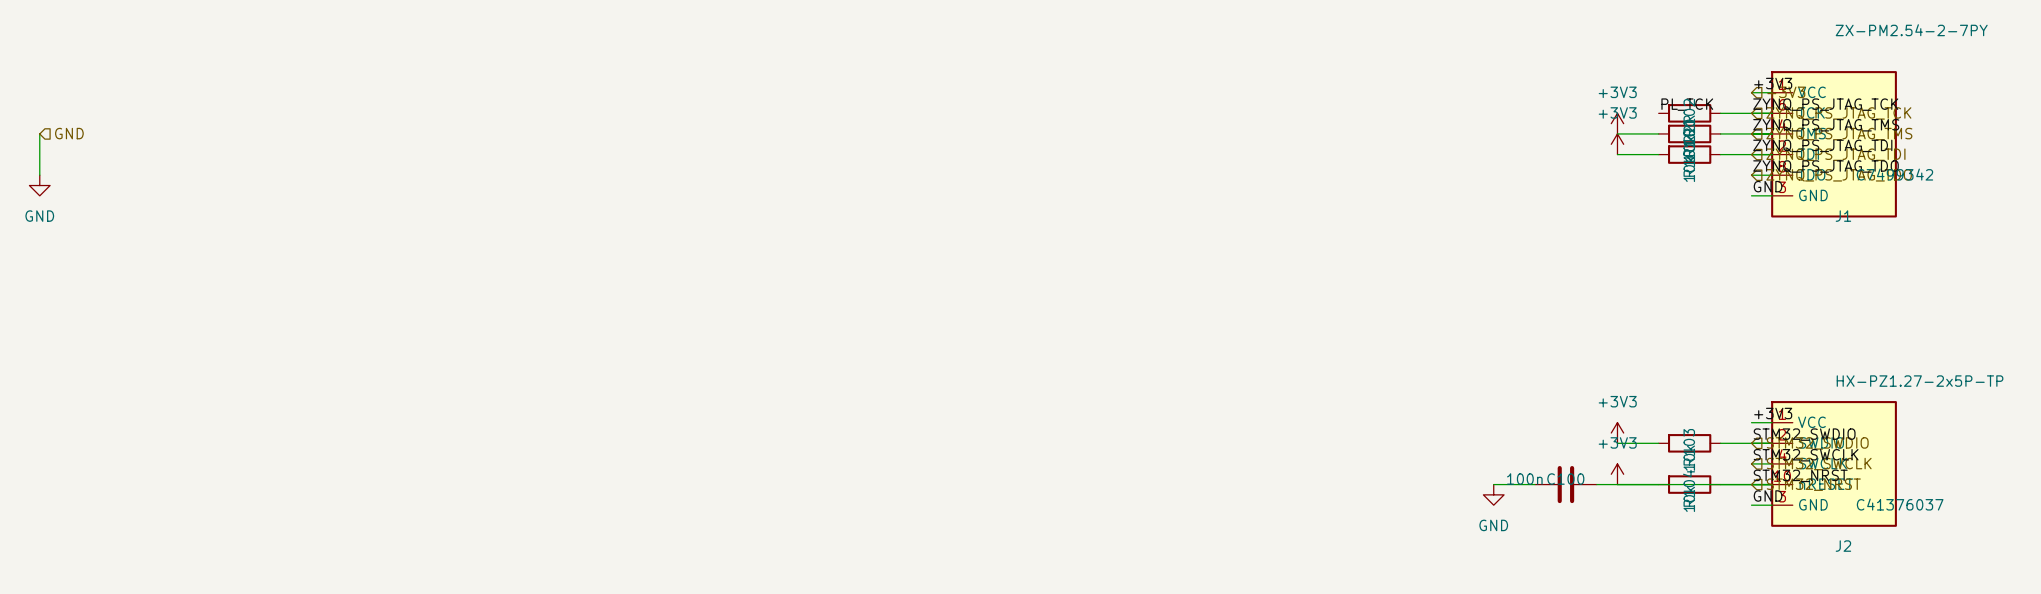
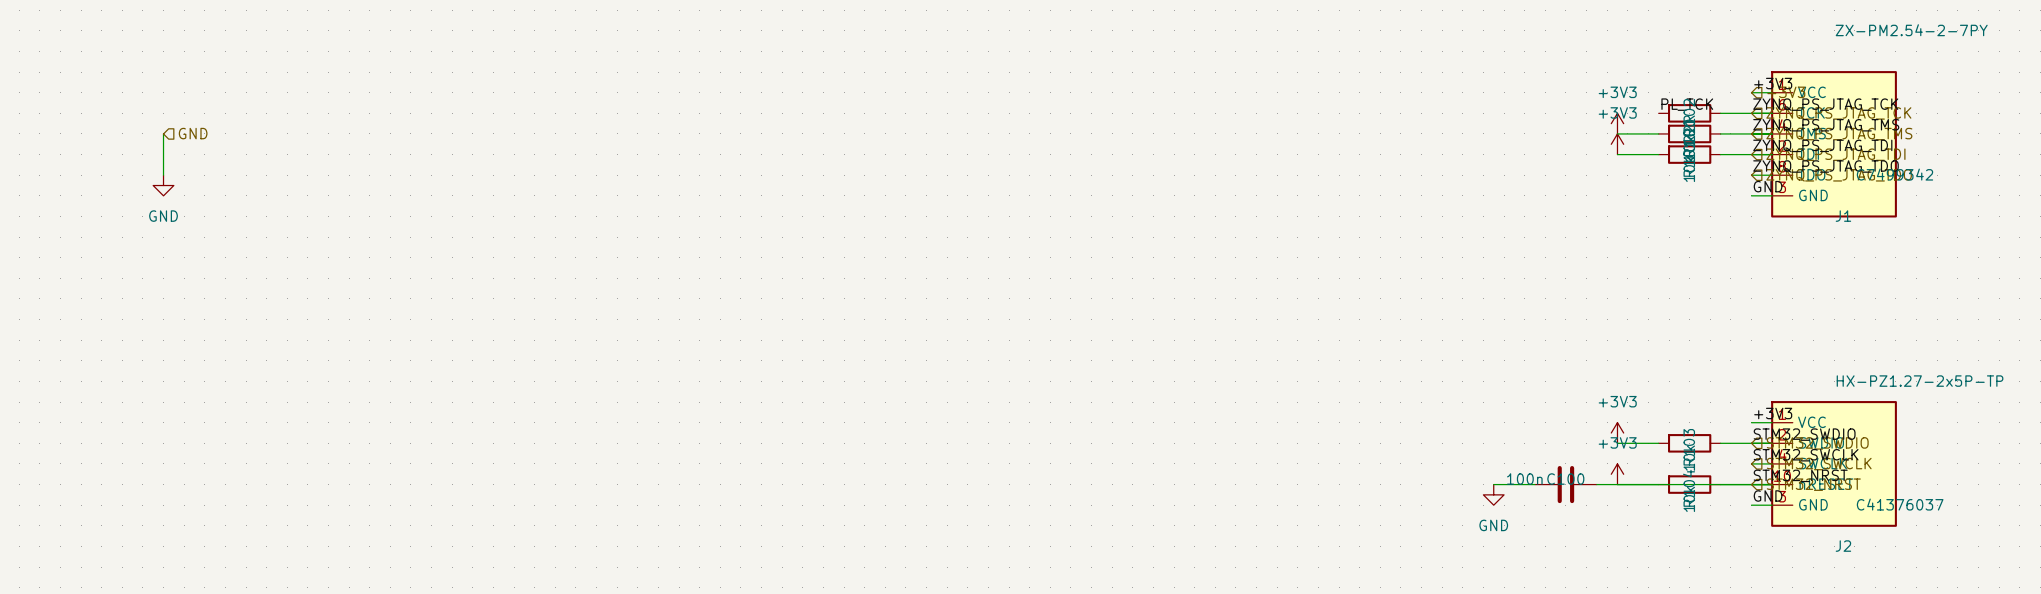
wire: (39, 133) (39, 175) -> (163, 133) (163, 175)
hierarchical label position: GND (69, 133) -> GND (193, 133)
power symbol position: GND (39, 185) -> GND (163, 185)

